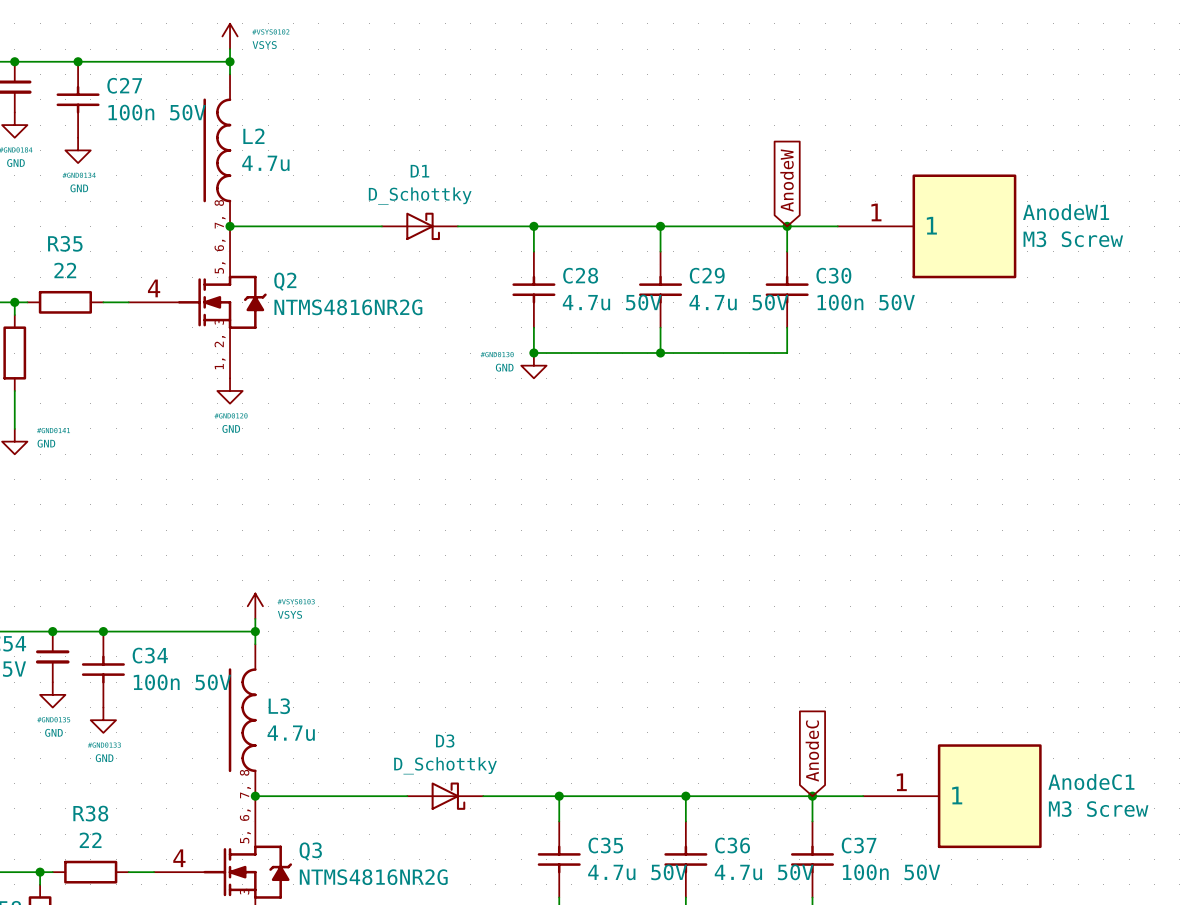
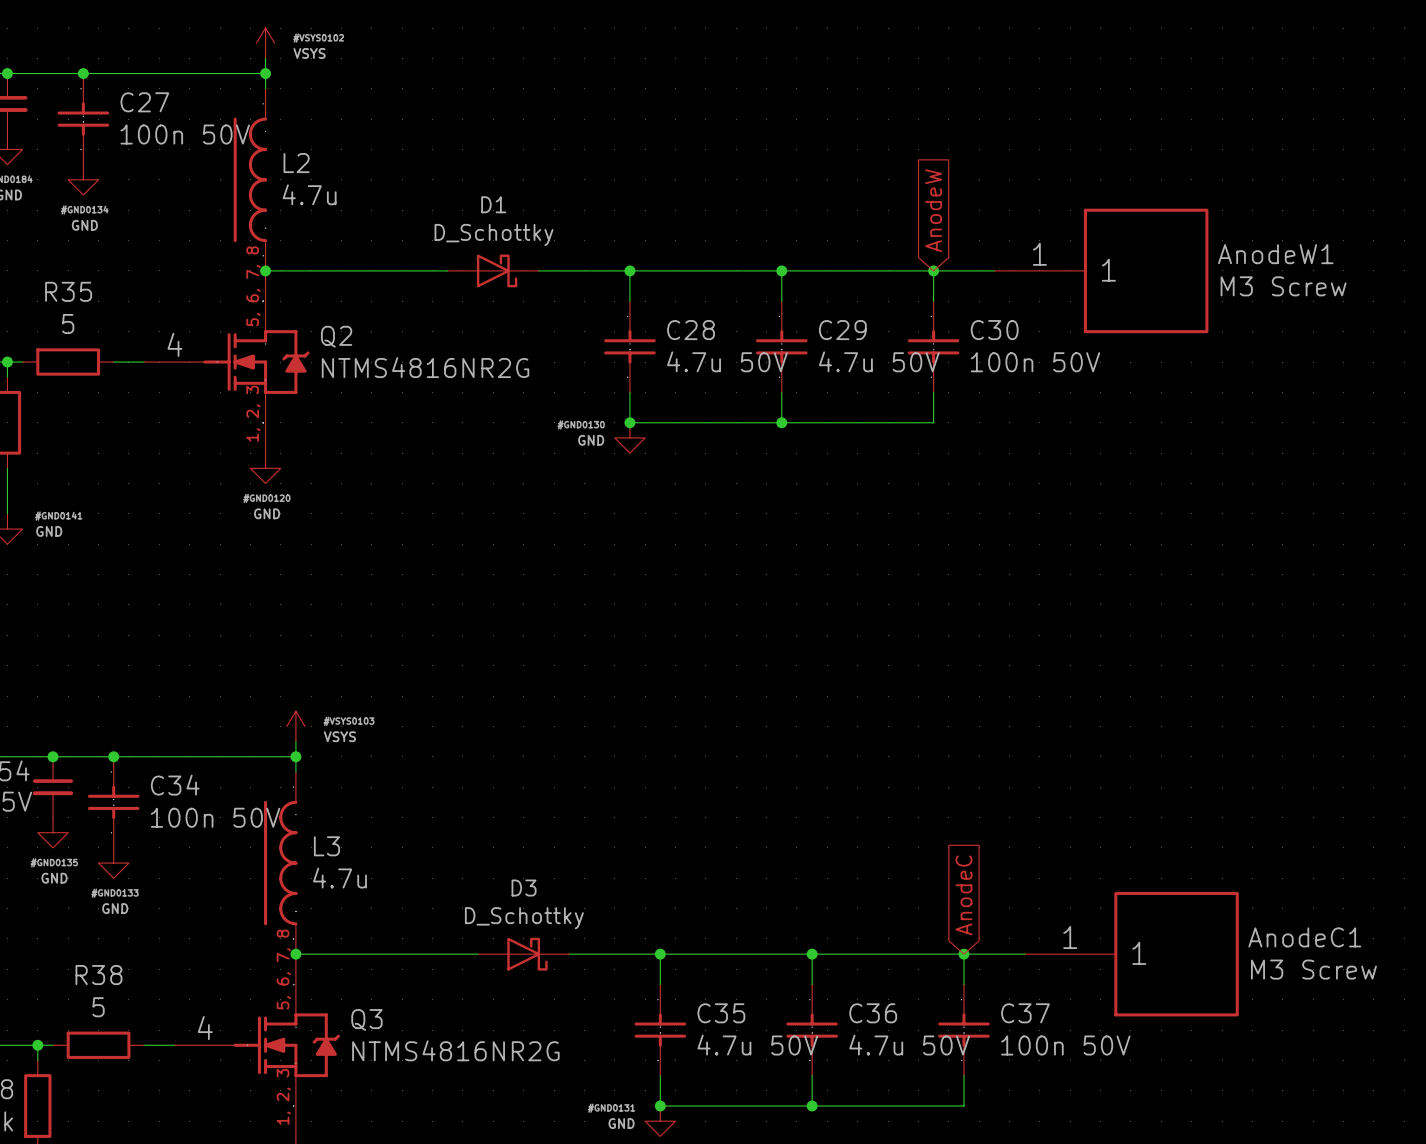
R35 value: 22 (65, 270) -> 5 (68, 324)
R38 value: 22 (90, 840) -> 5 (98, 1007)

